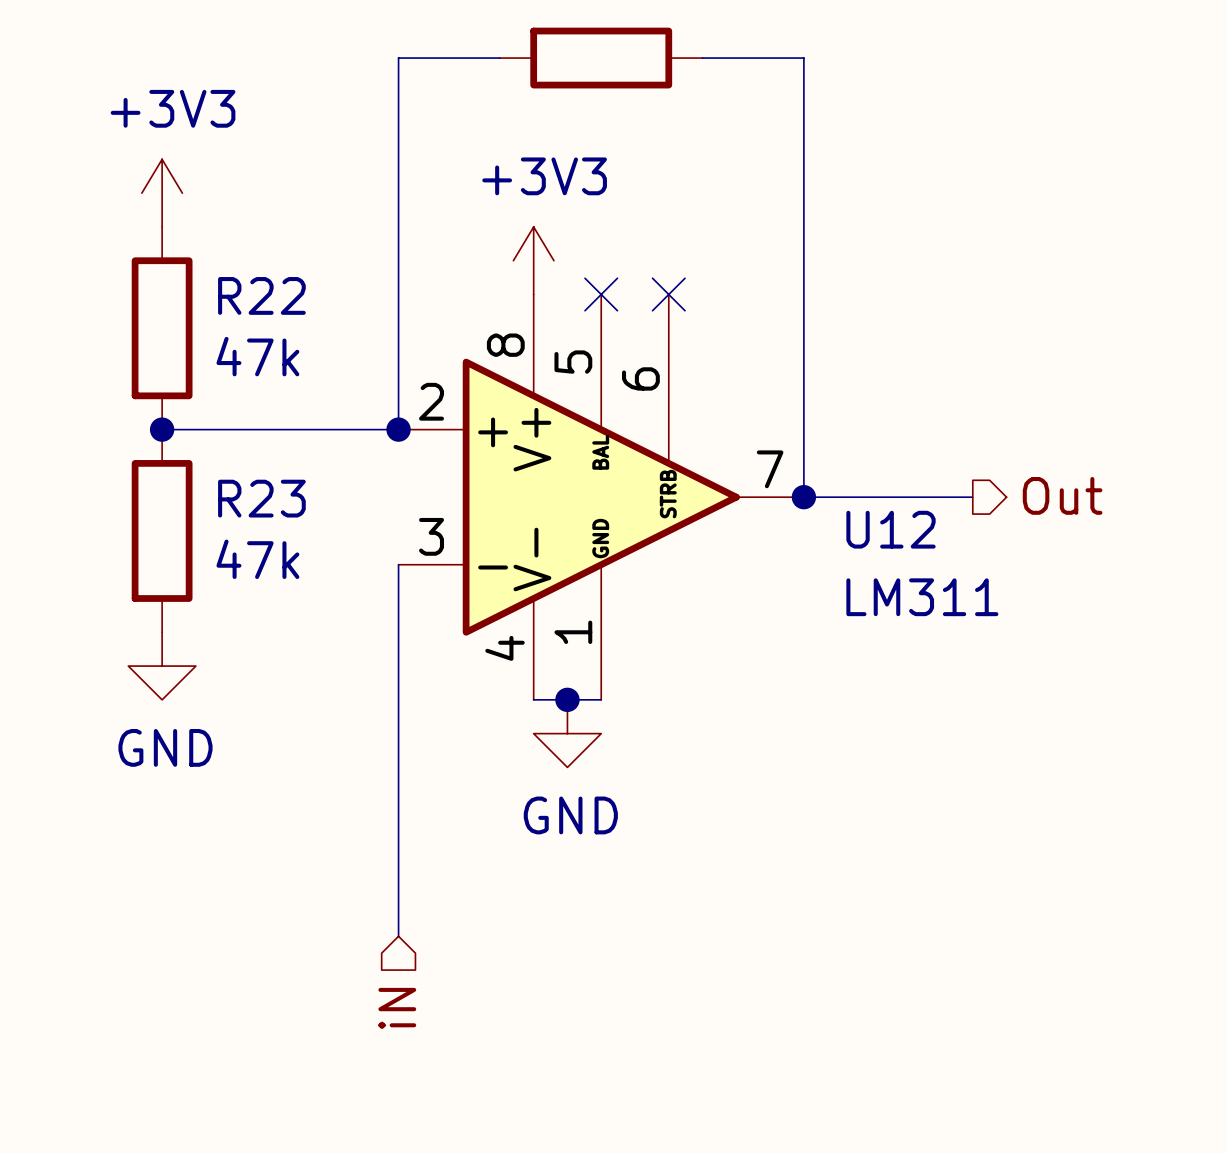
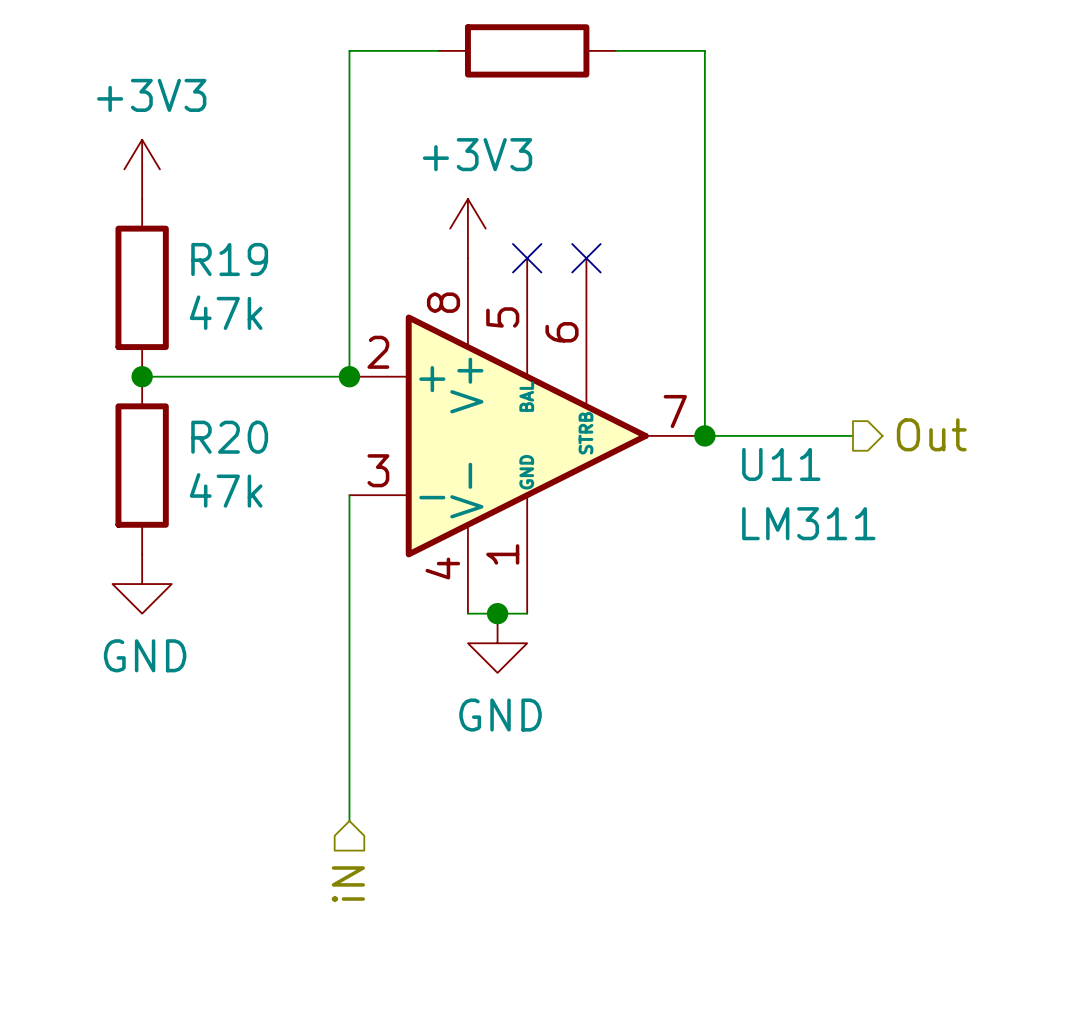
R22 name: R22 (261, 295) -> R19 (229, 259)
R23 name: R23 (261, 498) -> R20 (229, 437)
U12 name: U12 (891, 529) -> U11 (781, 464)

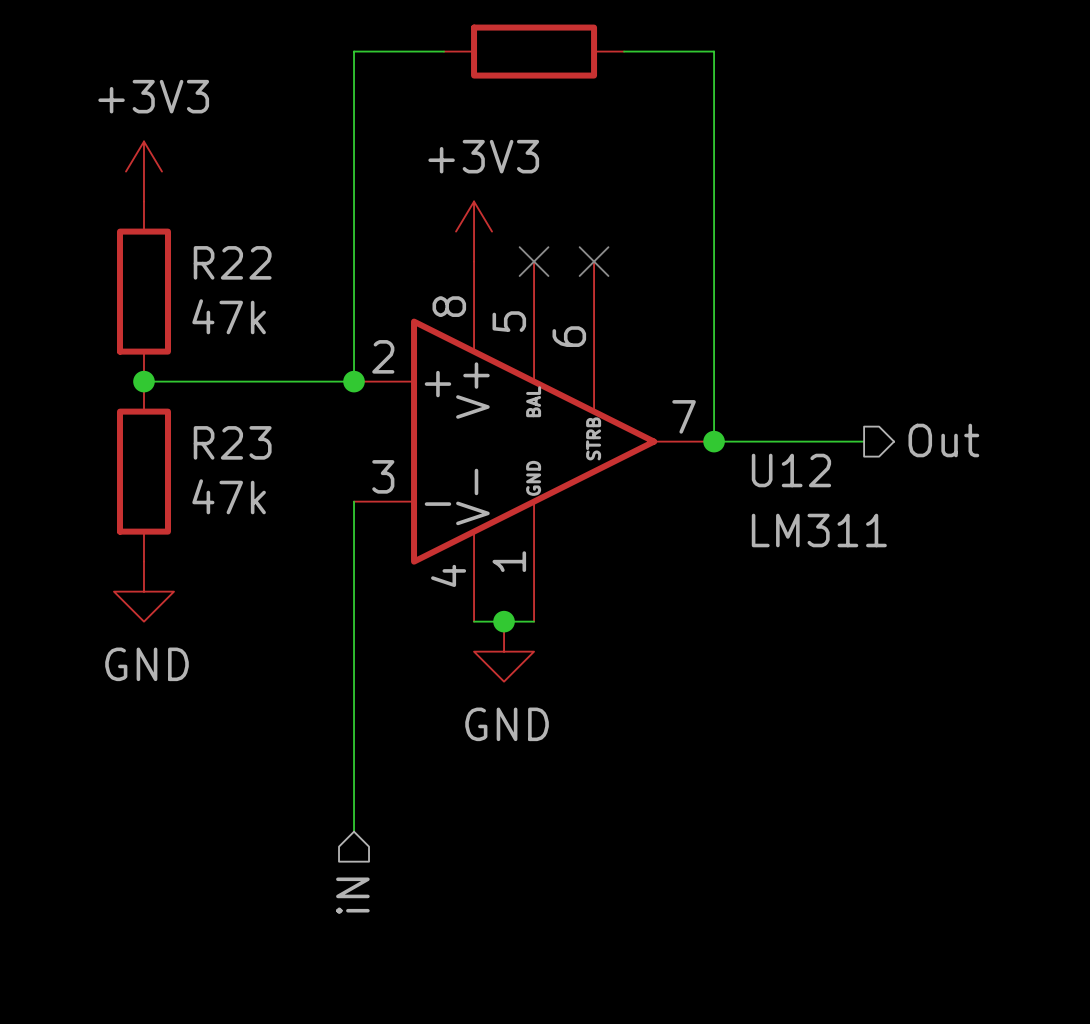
R19 name: R19 (229, 259) -> R22 (232, 262)
R20 name: R20 (229, 437) -> R23 (232, 442)
U11 name: U11 (781, 464) -> U12 (791, 470)

